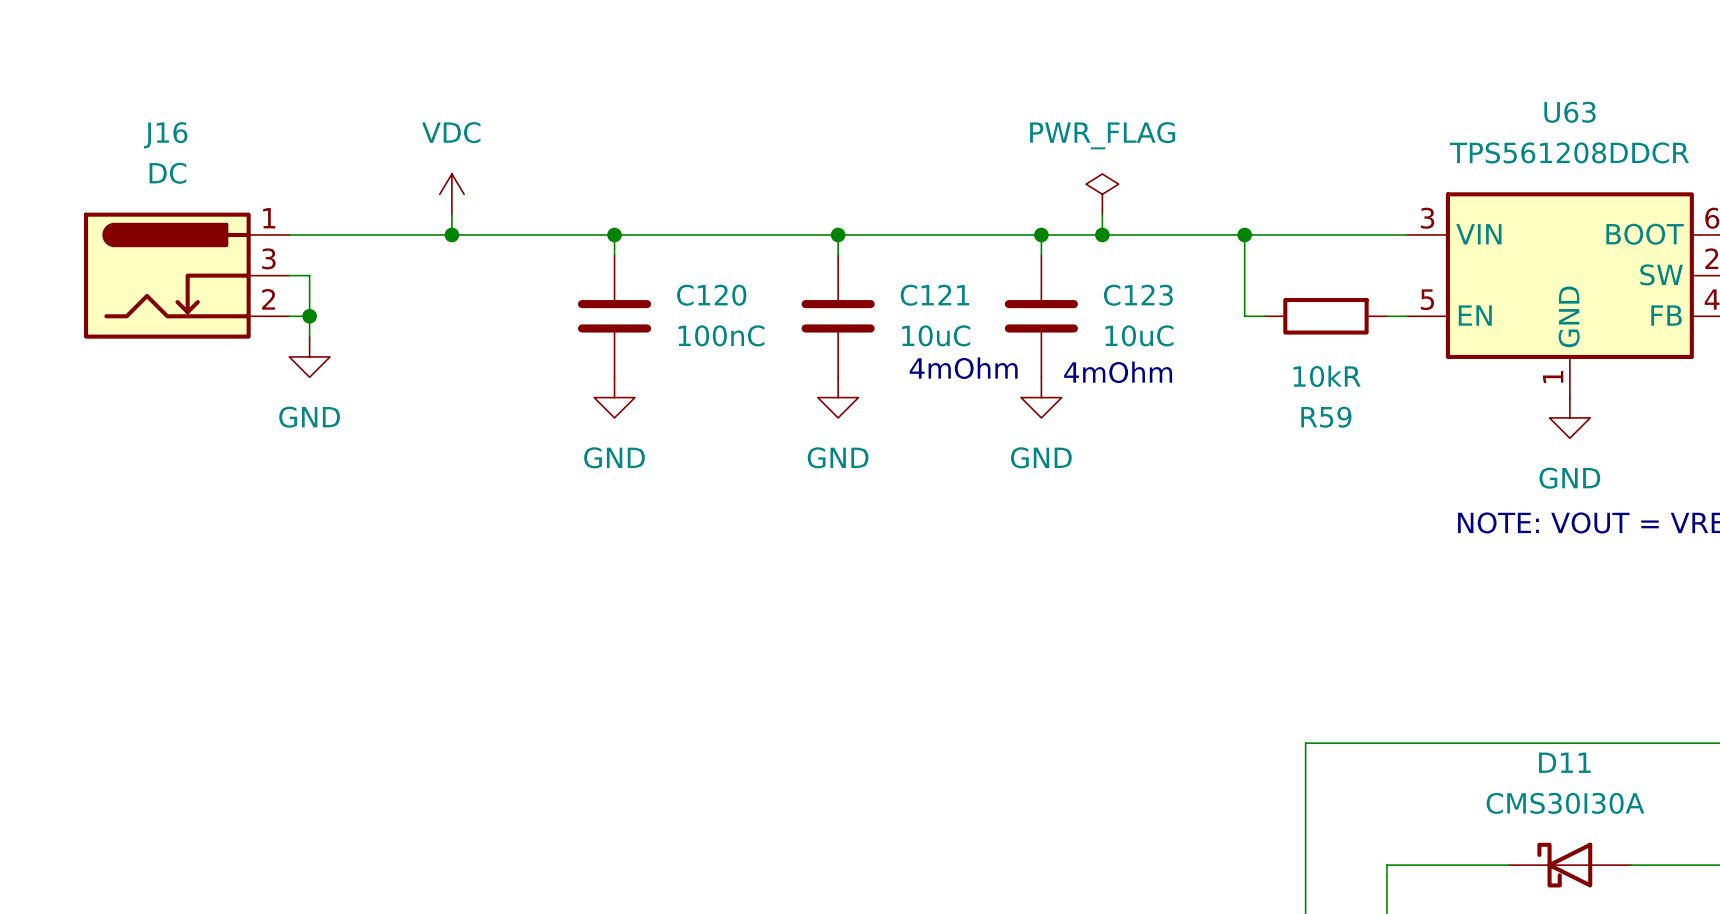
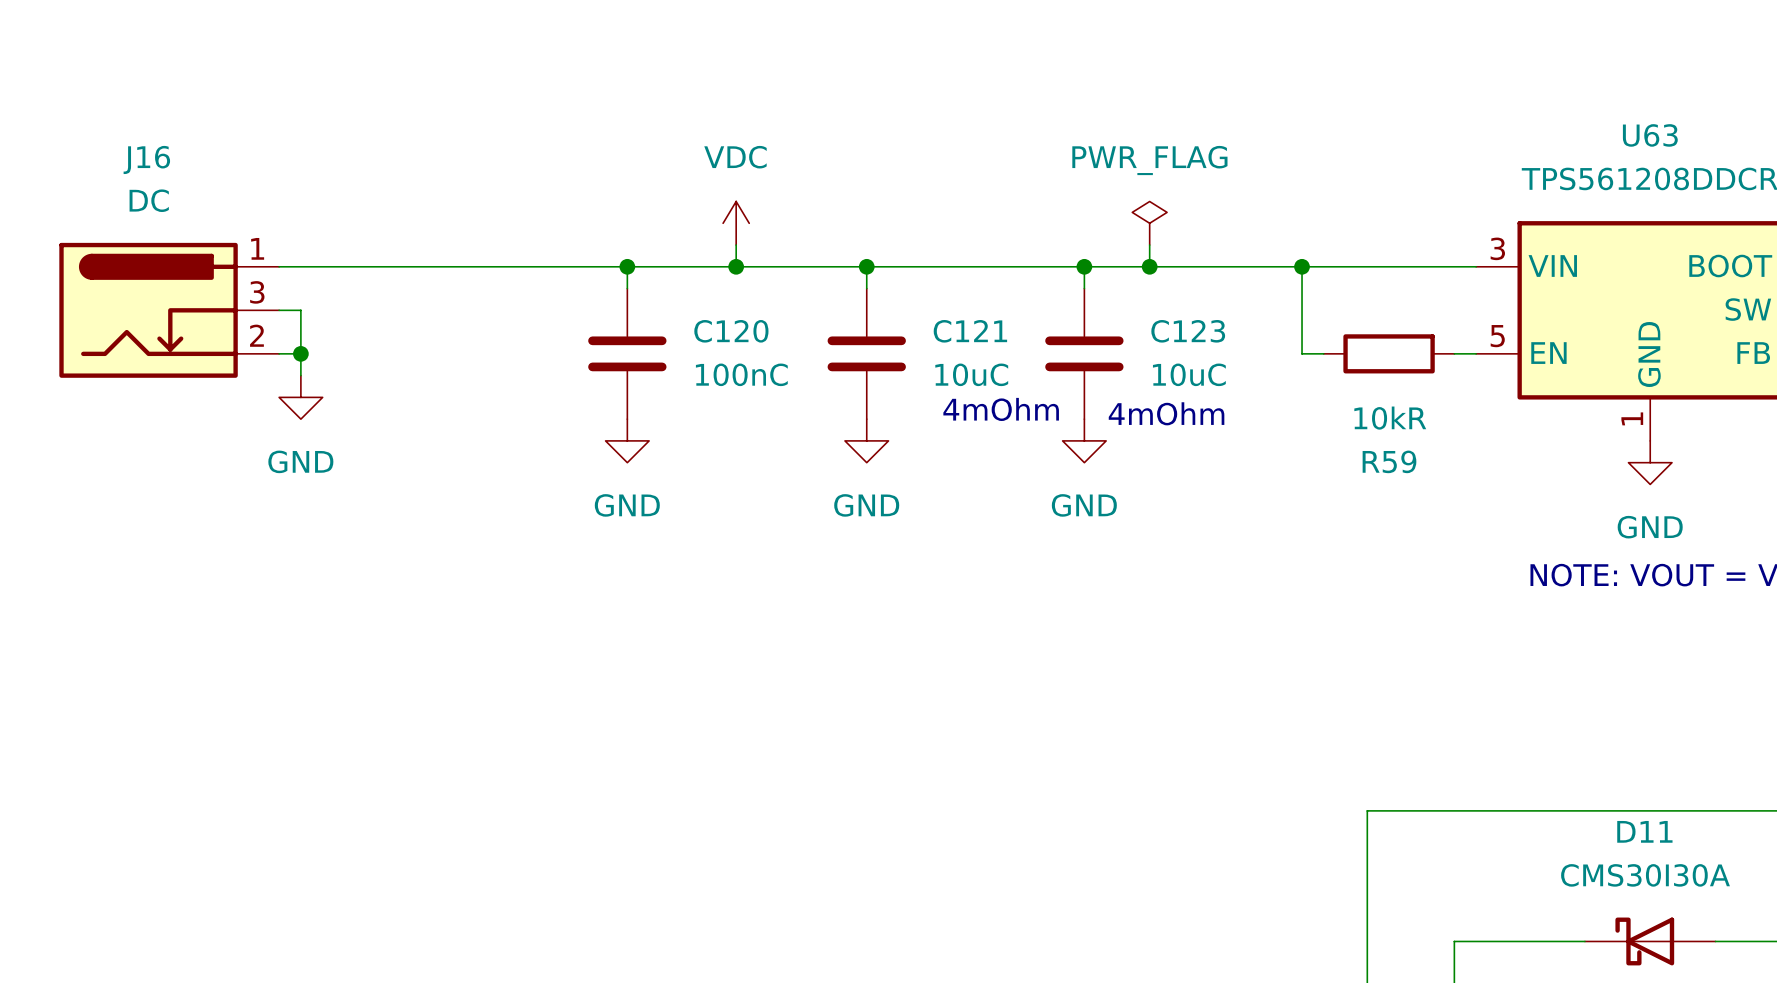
power symbol position: VDC (451, 194) -> VDC (736, 223)
wire: (451, 214) (451, 234) -> (736, 245) (736, 266)
junction: (451, 234) -> none
junction: none -> (736, 266)

